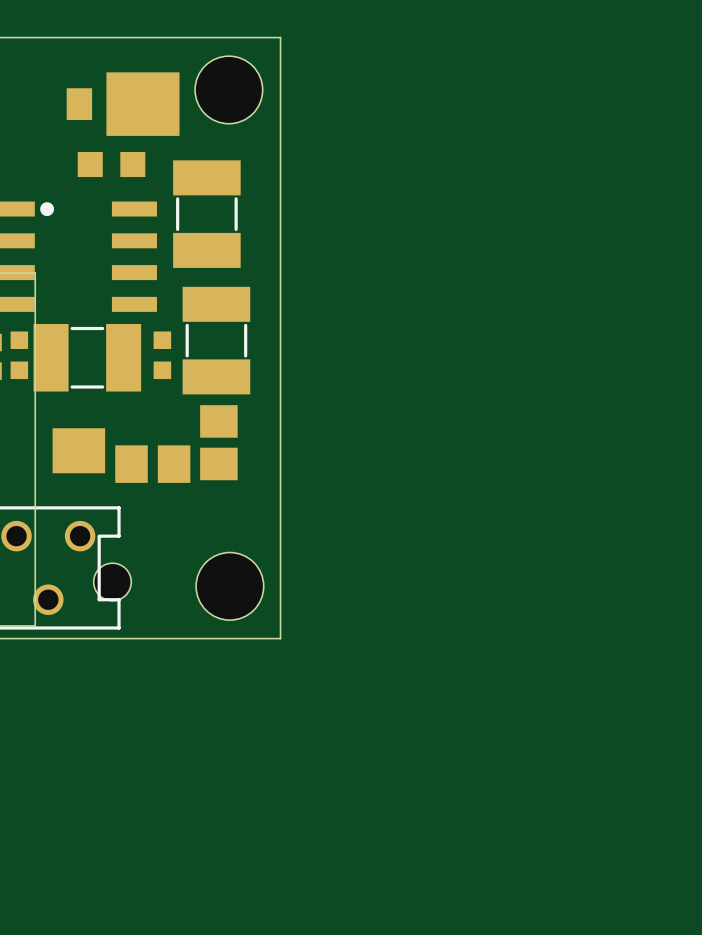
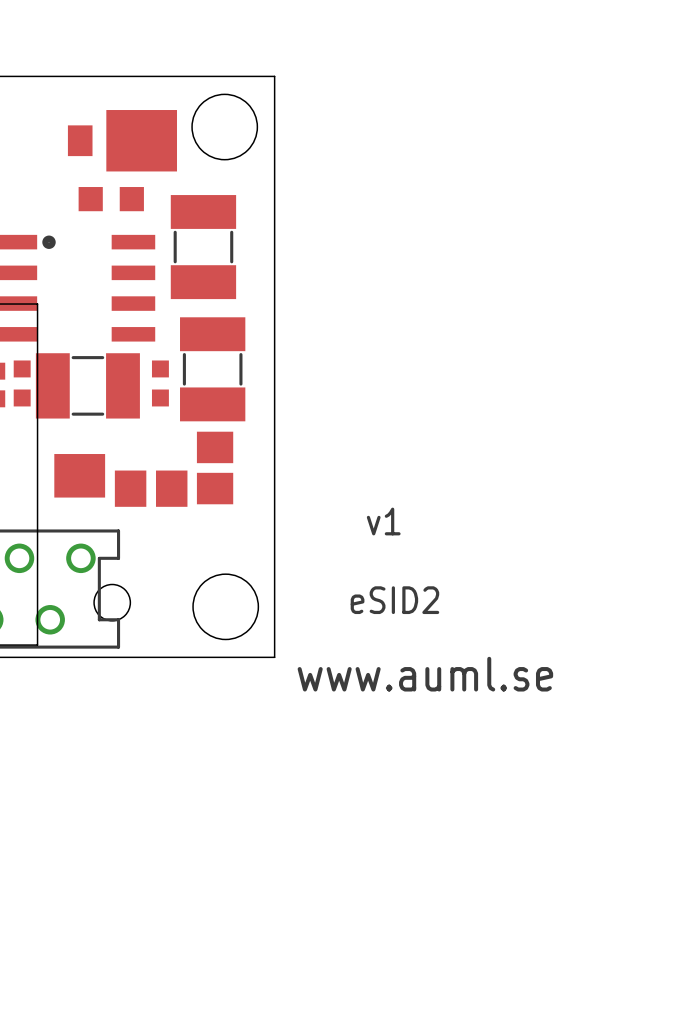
text: none -> v1 (383, 521)
text: none -> eSID2 (394, 600)
text: none -> www.auml.se (425, 674)

